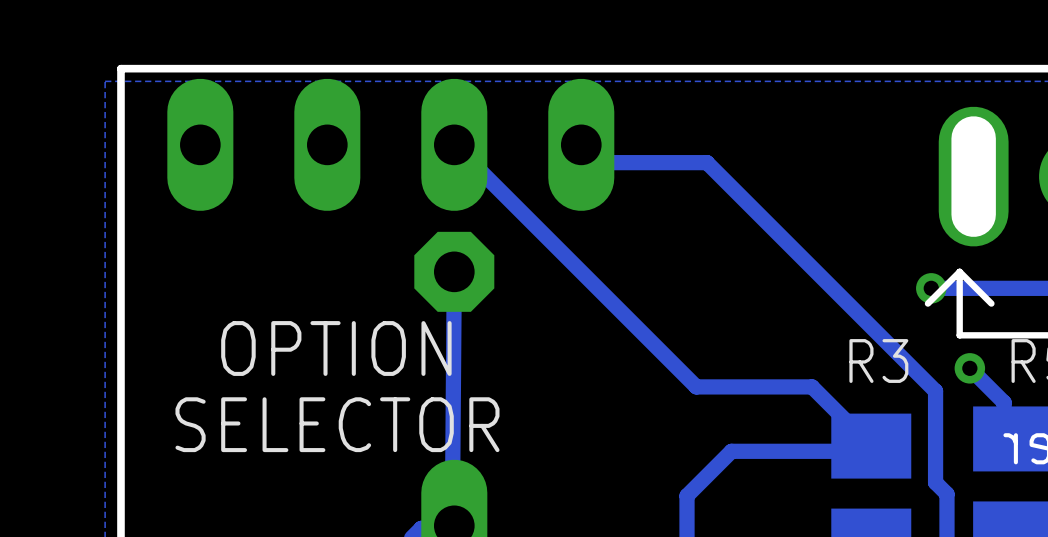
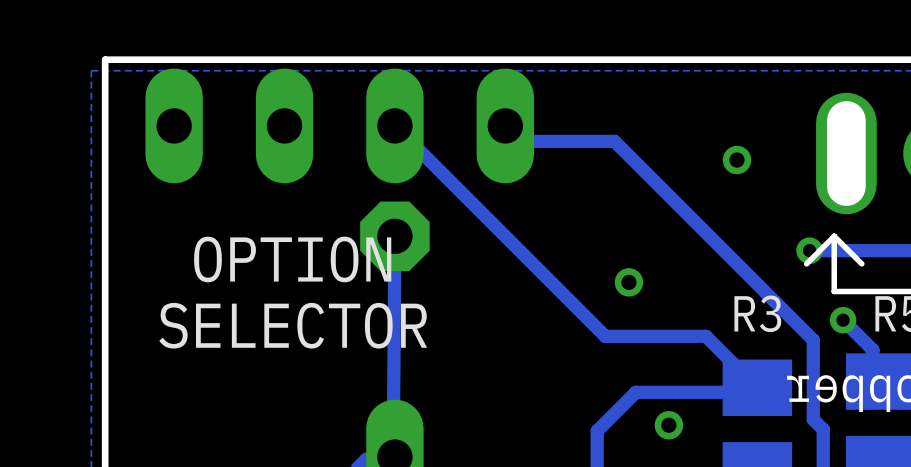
via: none -> (737, 160)
via: none -> (628, 282)
text position: OPTION (336, 348) -> OPTION (292, 259)
text position: SELECTOR (337, 424) -> SELECTOR (293, 325)
via: none -> (668, 425)

